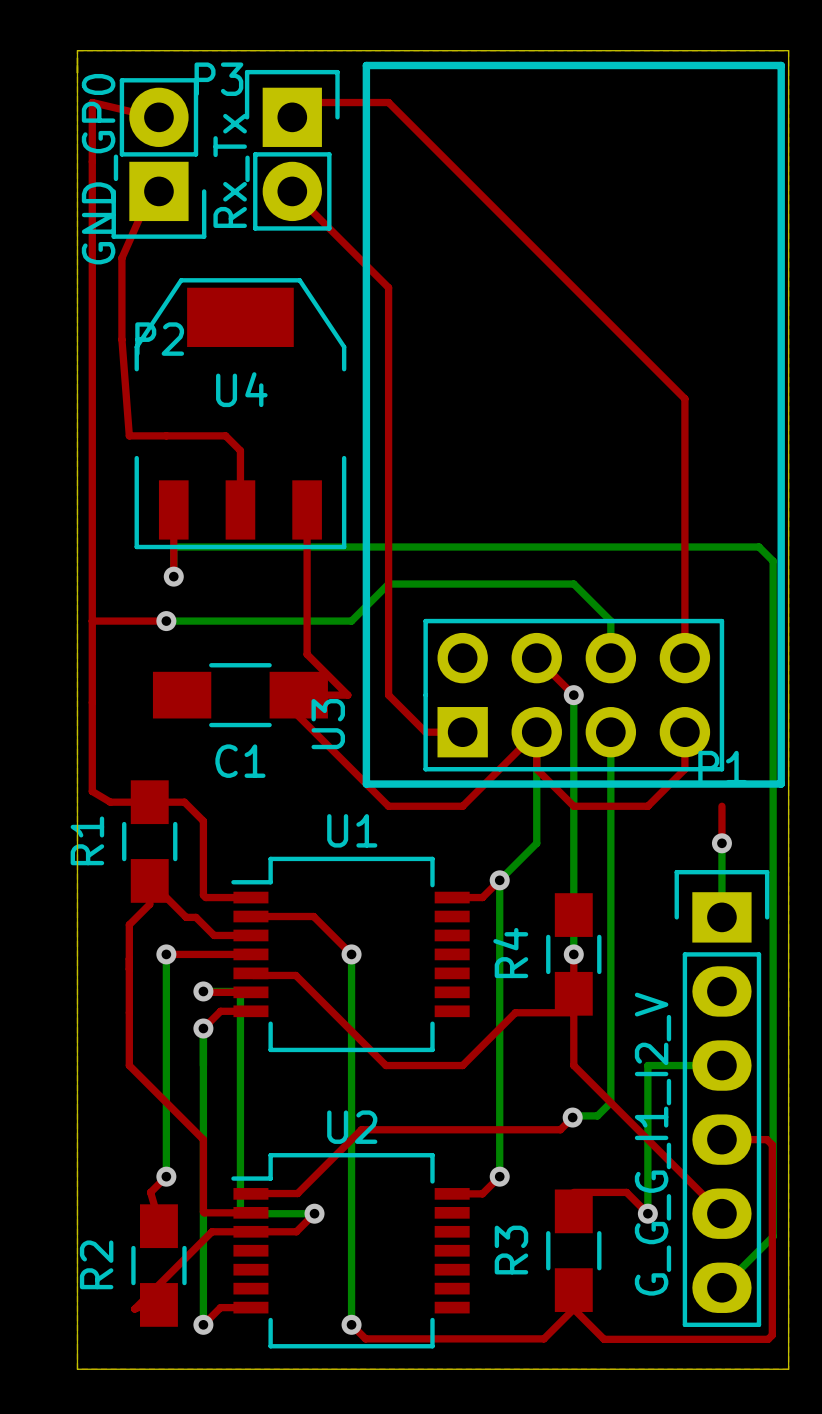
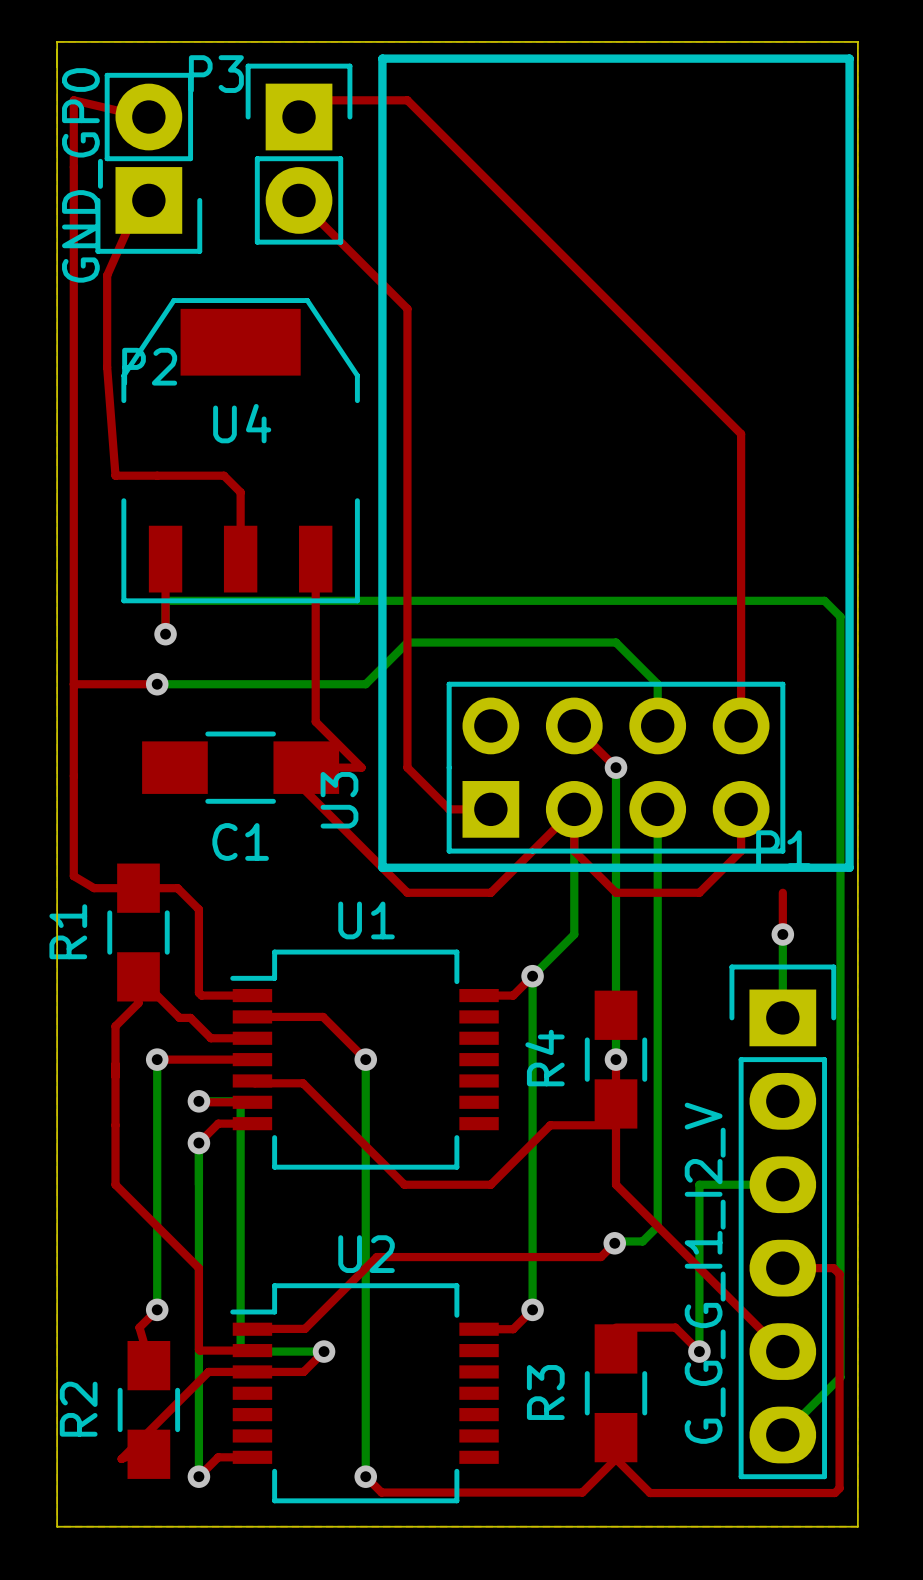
P3 value: Rx_Tx (231, 170) -> none

